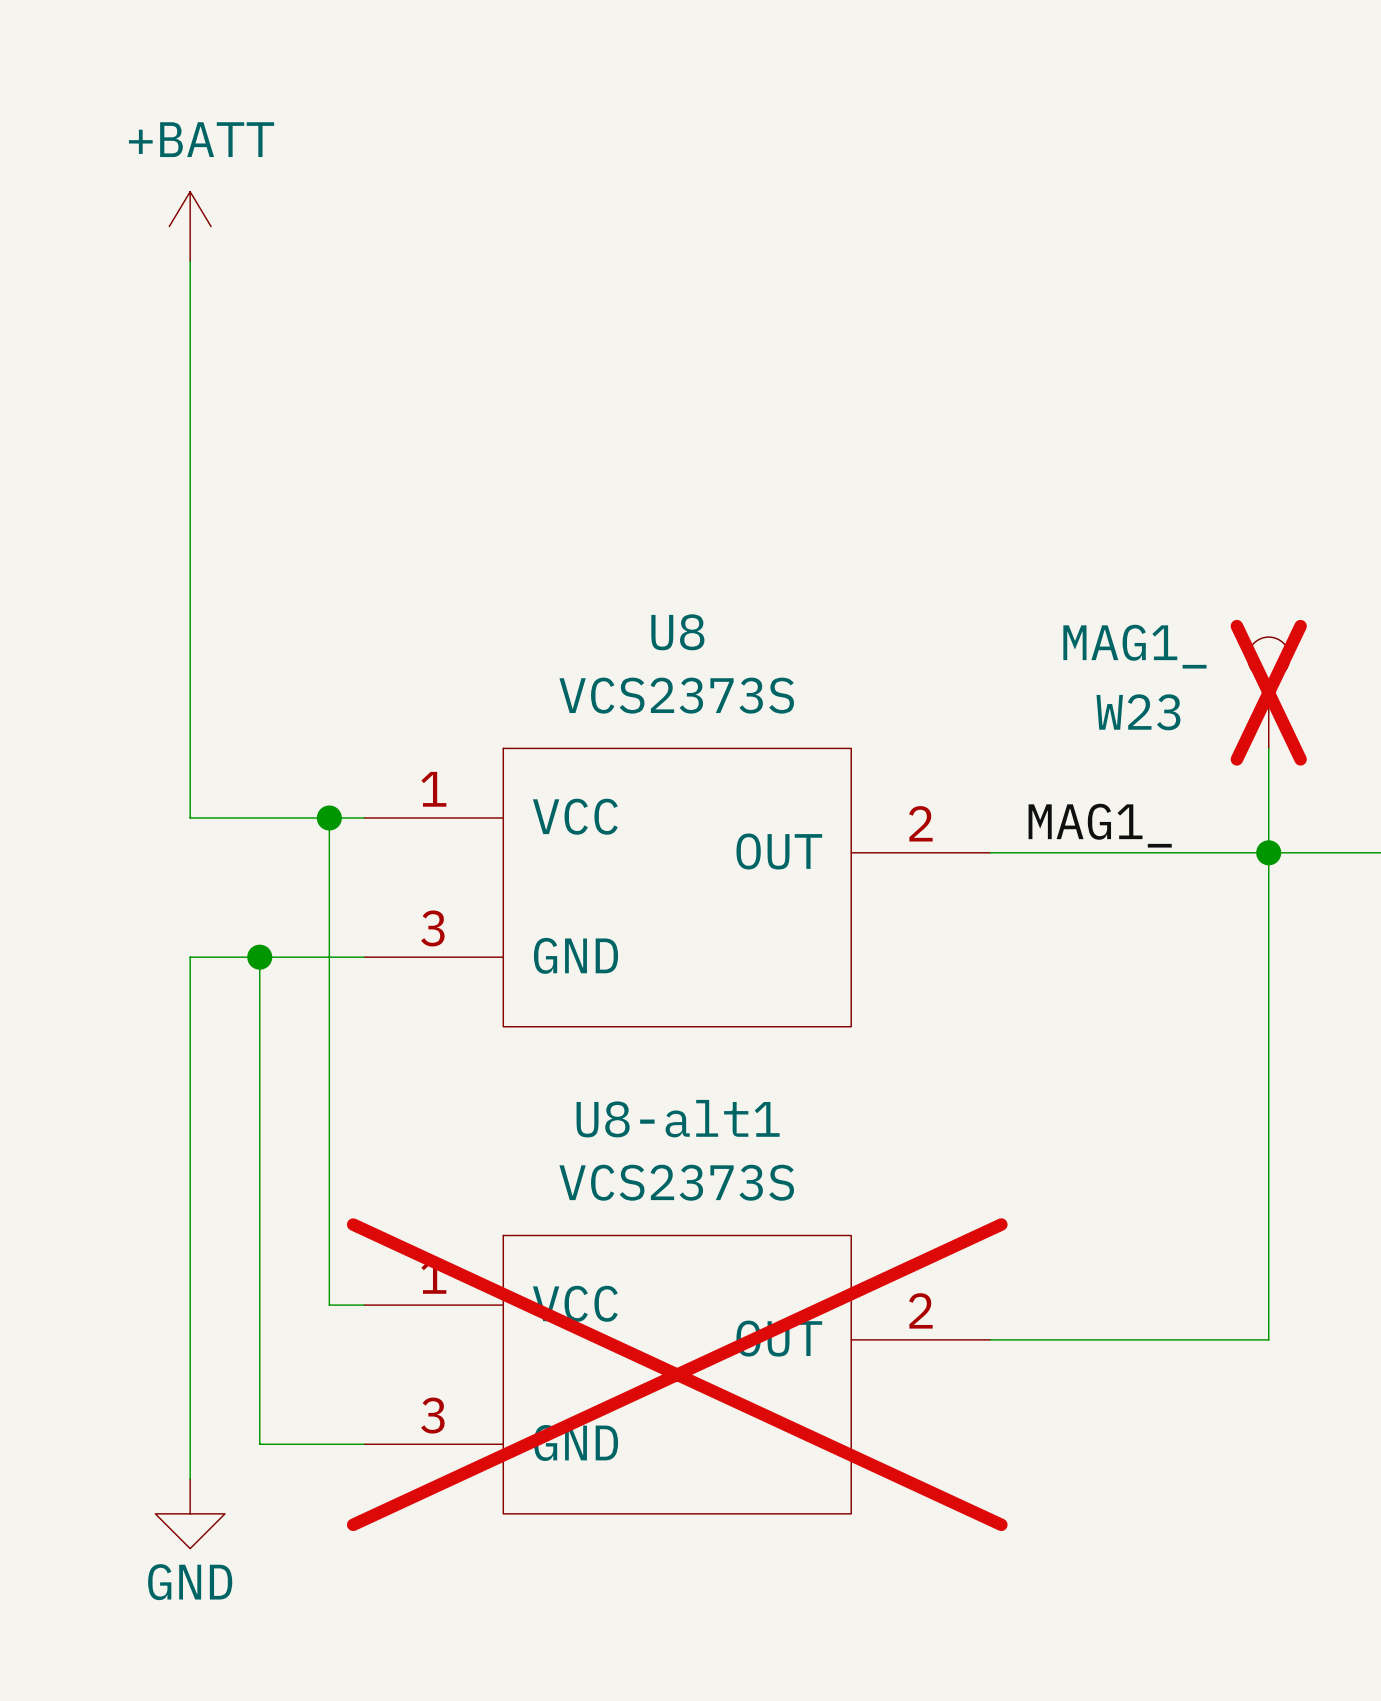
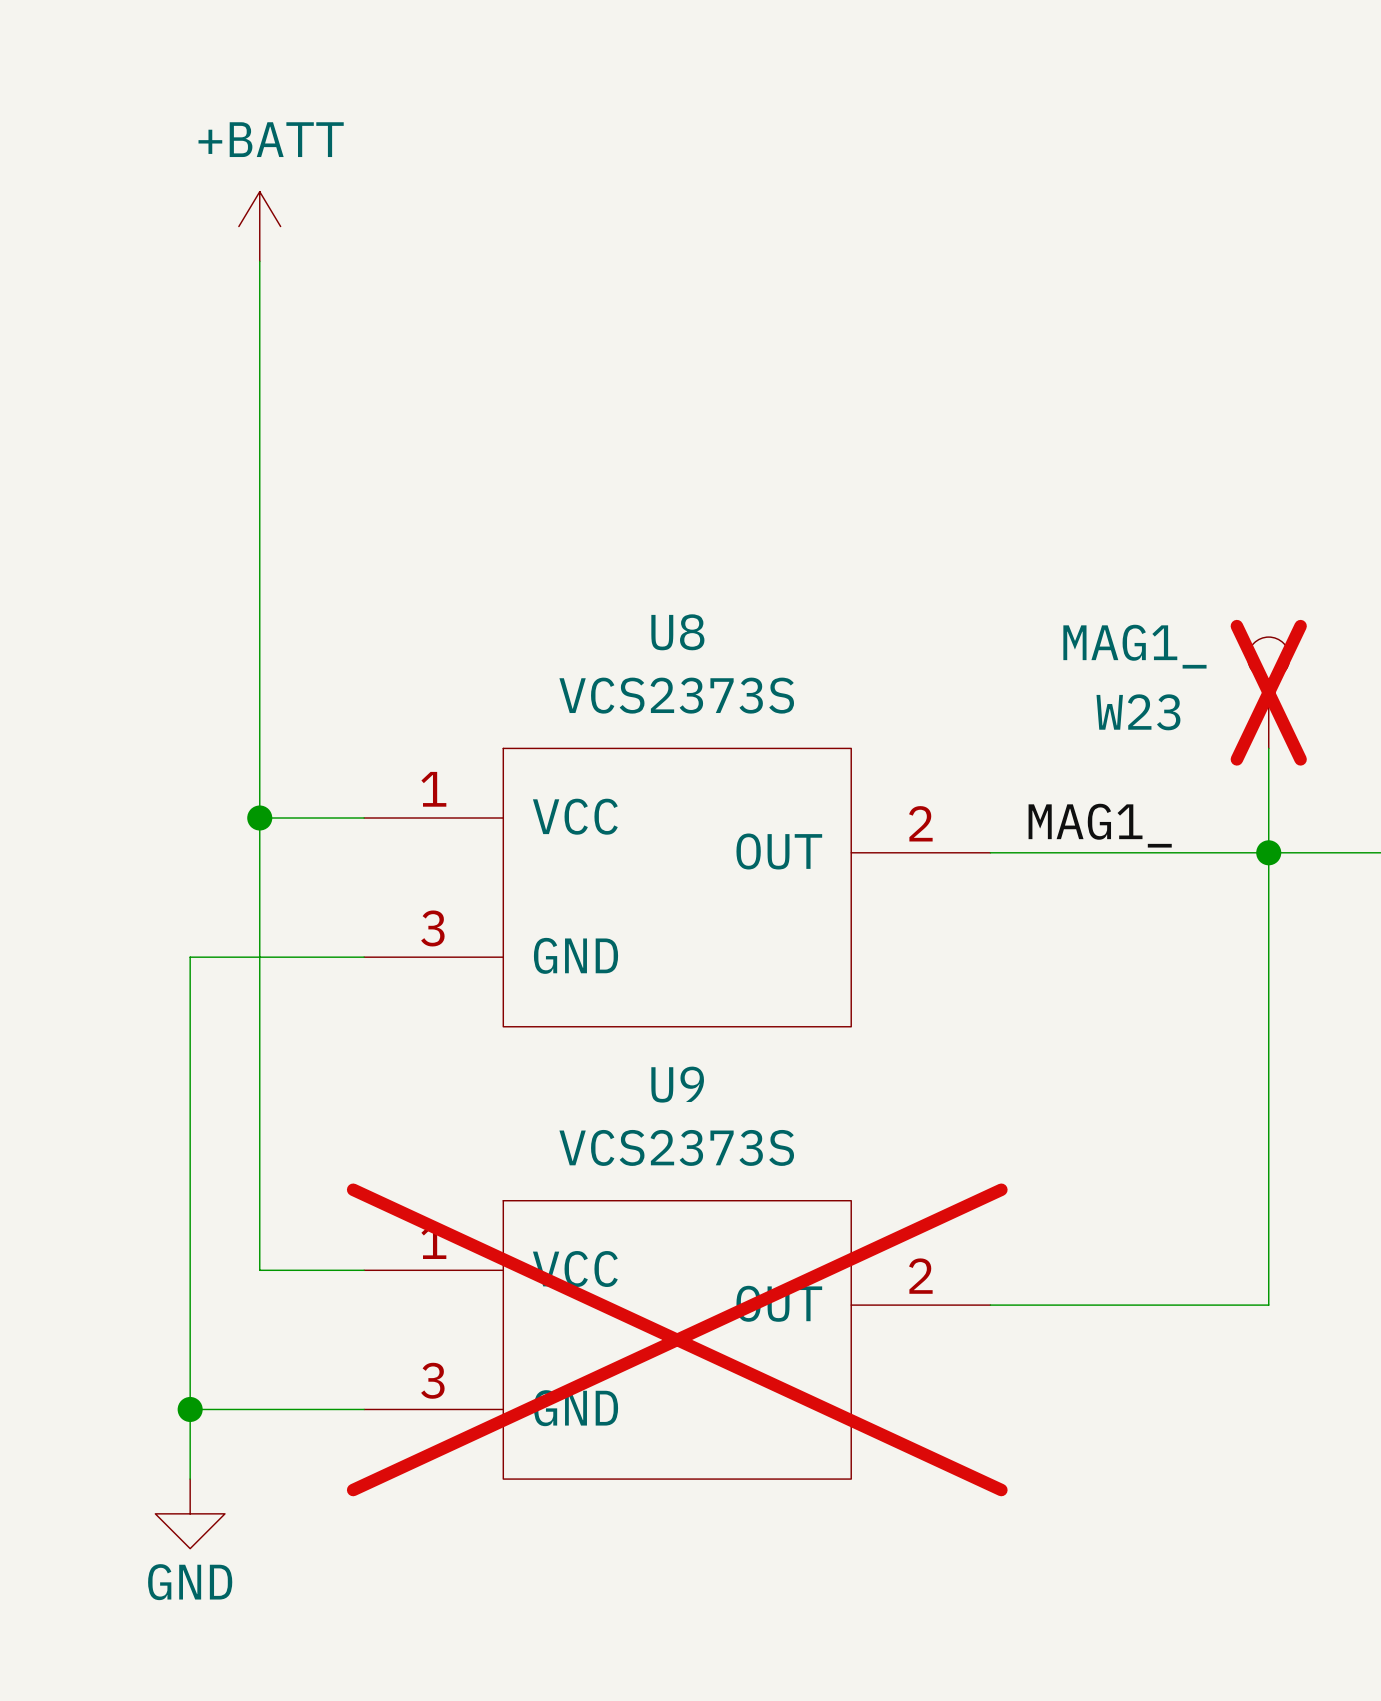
power symbol position: +BATT (190, 226) -> +BATT (259, 226)
wire: (190, 261) (190, 818) (259, 818) -> none
wire: none -> (259, 261) (259, 957)
junction: none -> (259, 818)
wire: (329, 818) (329, 1305) (364, 1305) -> none
junction: (329, 818) -> none
junction: (259, 957) -> none
wire: (259, 1270) (259, 1444) (364, 1444) -> (259, 1270) (364, 1270)
wire: (1268, 1305) (1268, 1339) (990, 1339) -> (1268, 1305) (990, 1305)
U9: none -> VCS2373S (677, 1339)
U8-alt1: VCS2373S (677, 1374) -> none
wire: none -> (190, 1409) (364, 1409)
junction: none -> (190, 1409)

